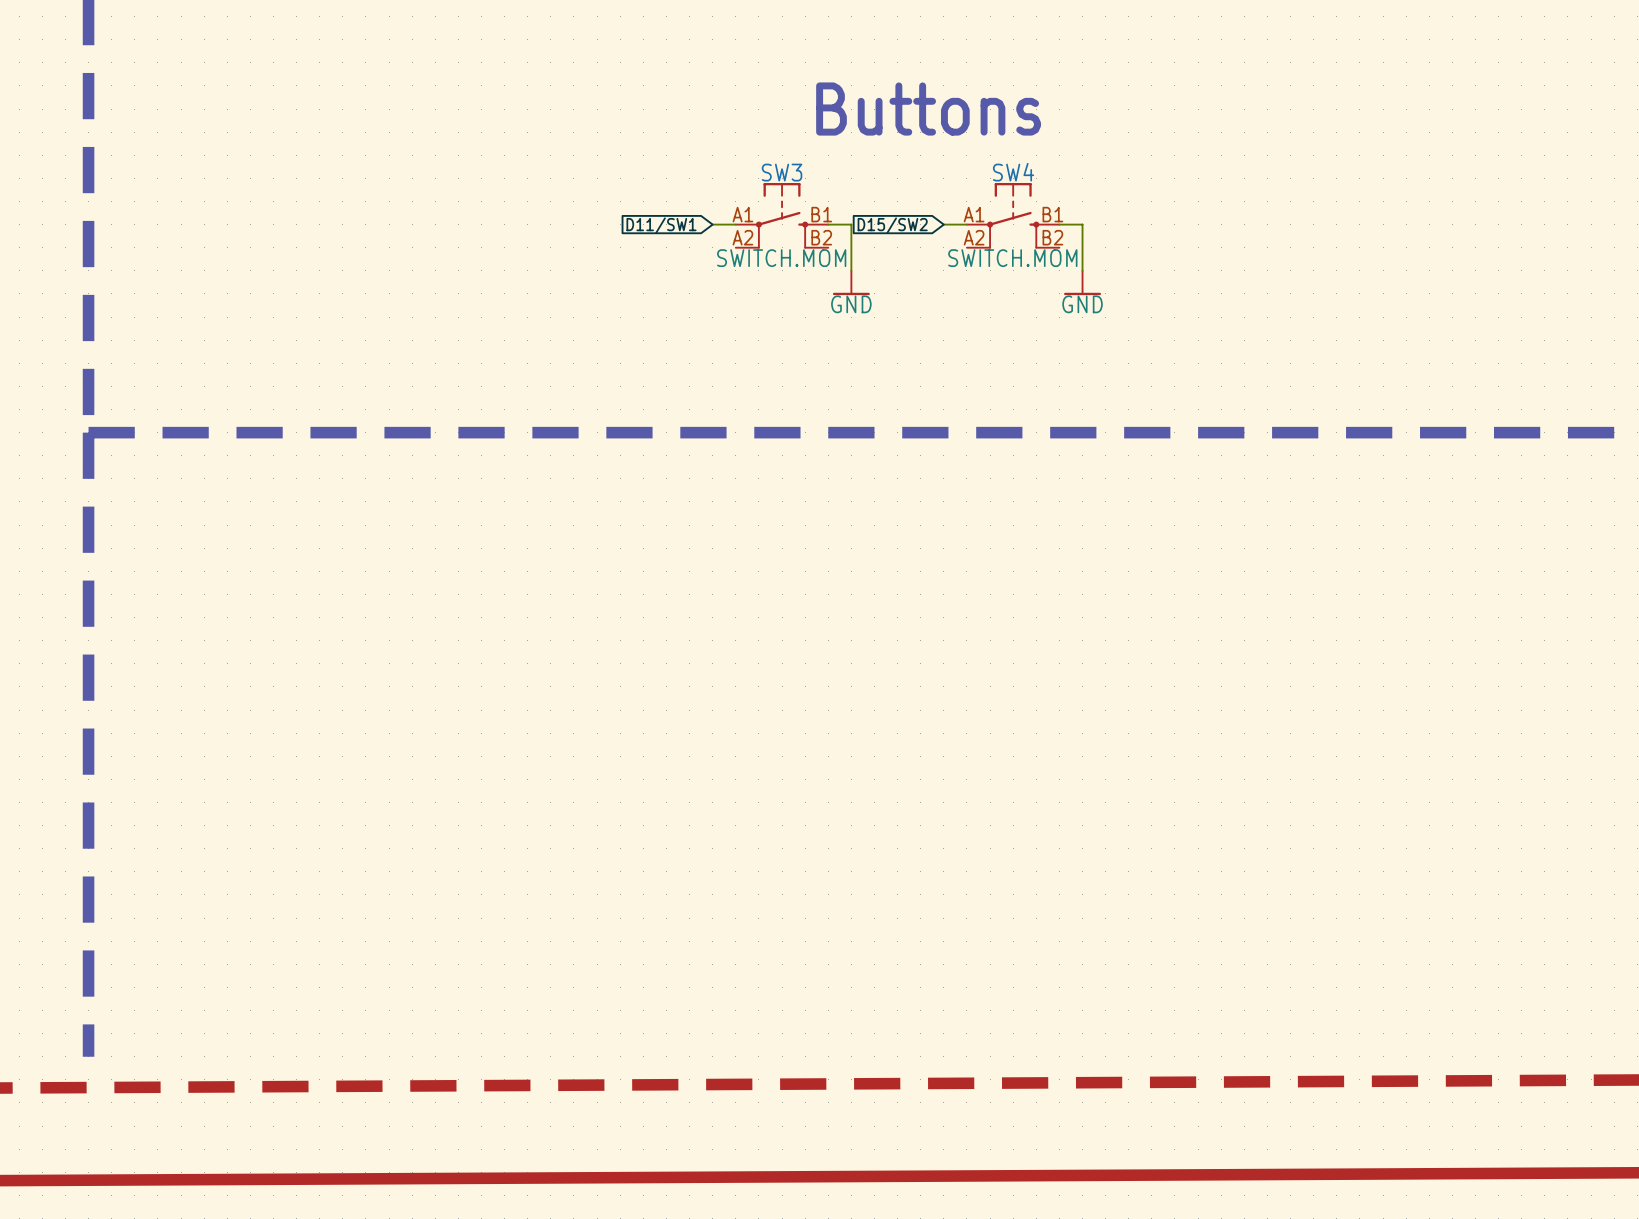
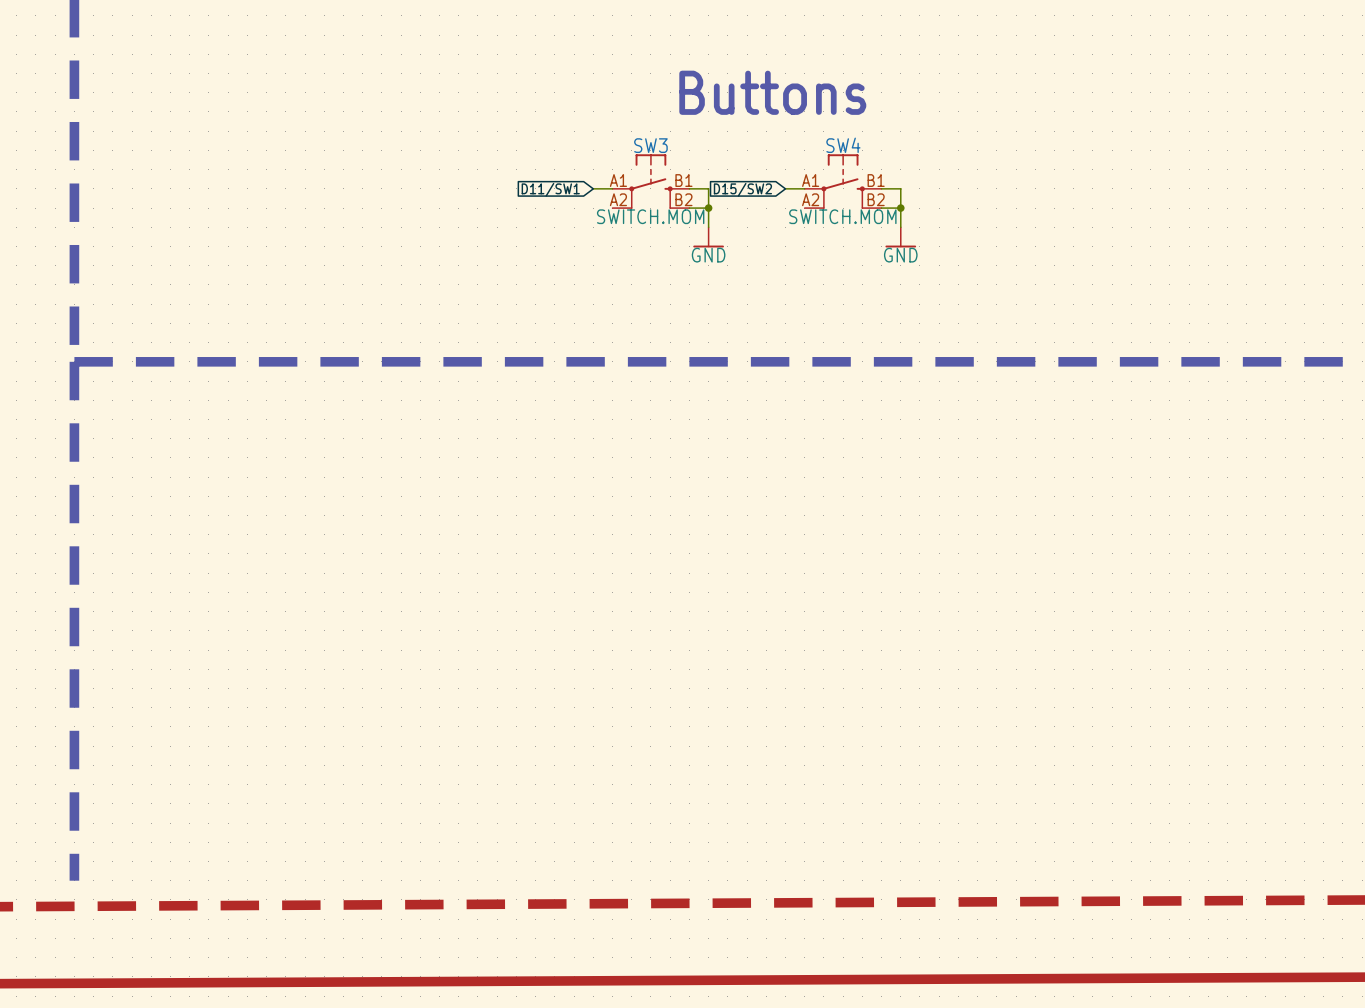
wire: none -> (689, 208) (708, 208)
junction: none -> (708, 208)
wire: none -> (881, 208) (900, 208)
junction: none -> (900, 208)

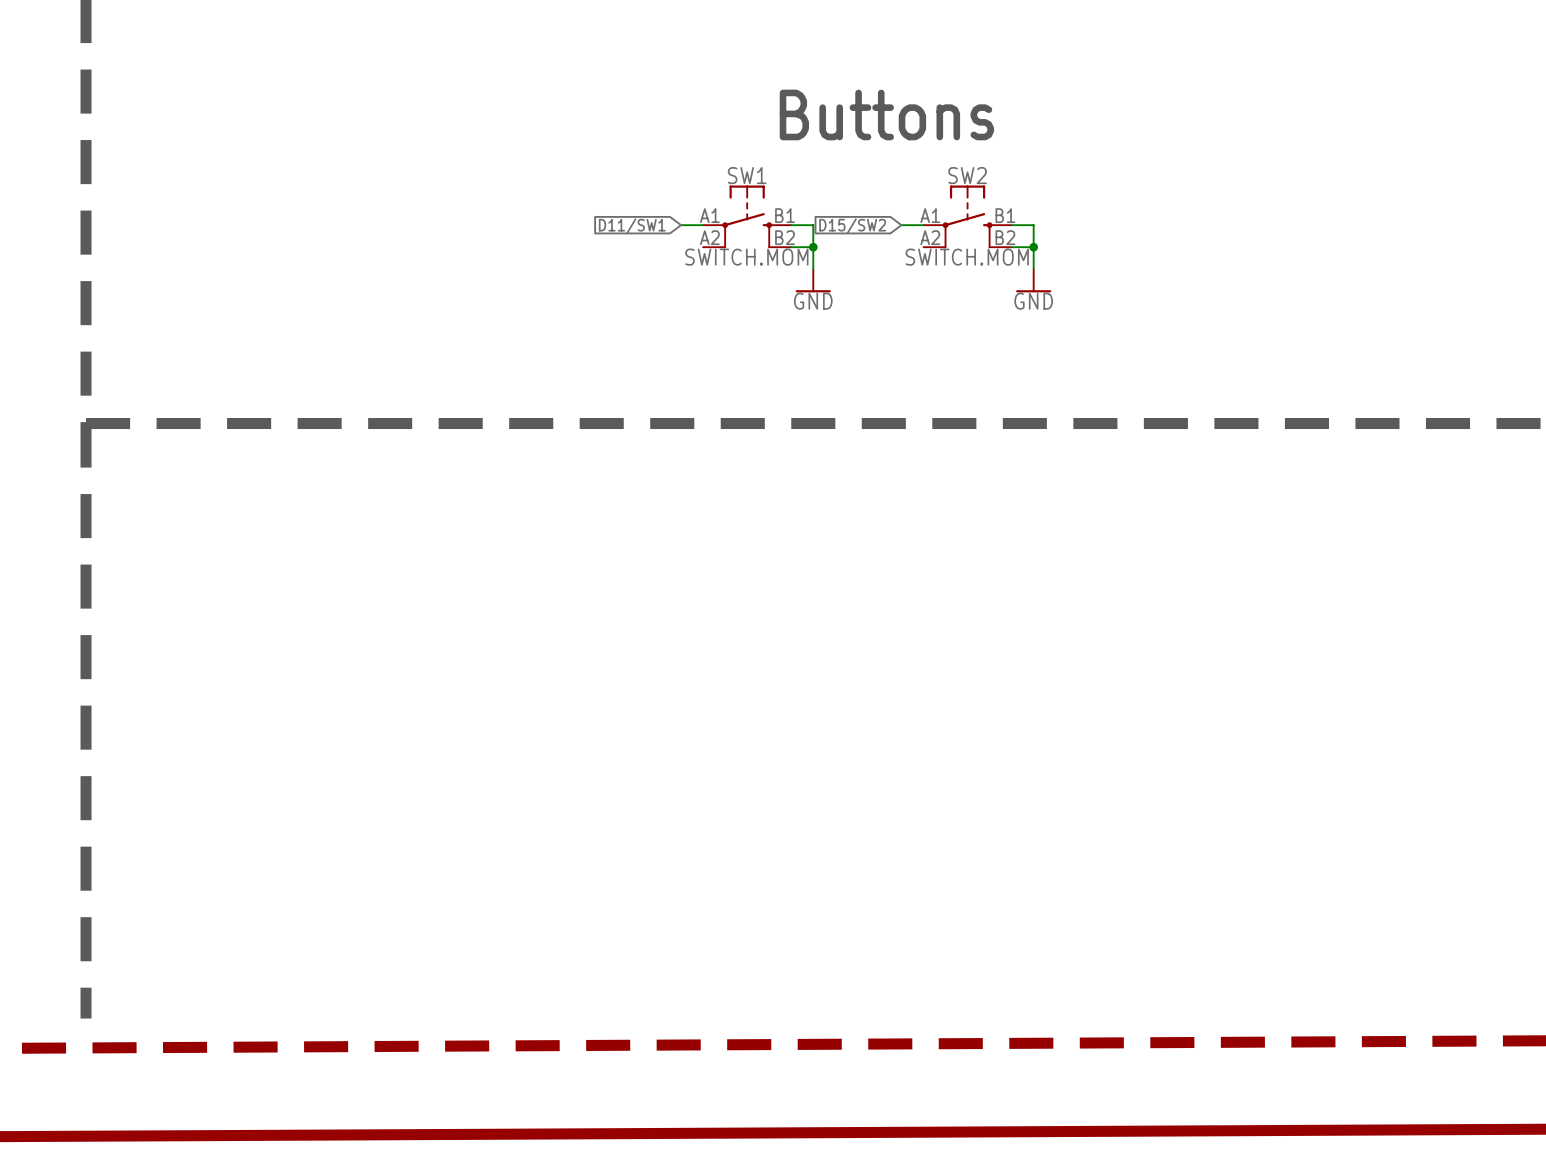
SW3 name: SW3 (650, 145) -> SW1 (747, 175)
SW4 name: SW4 (843, 145) -> SW2 (967, 175)

